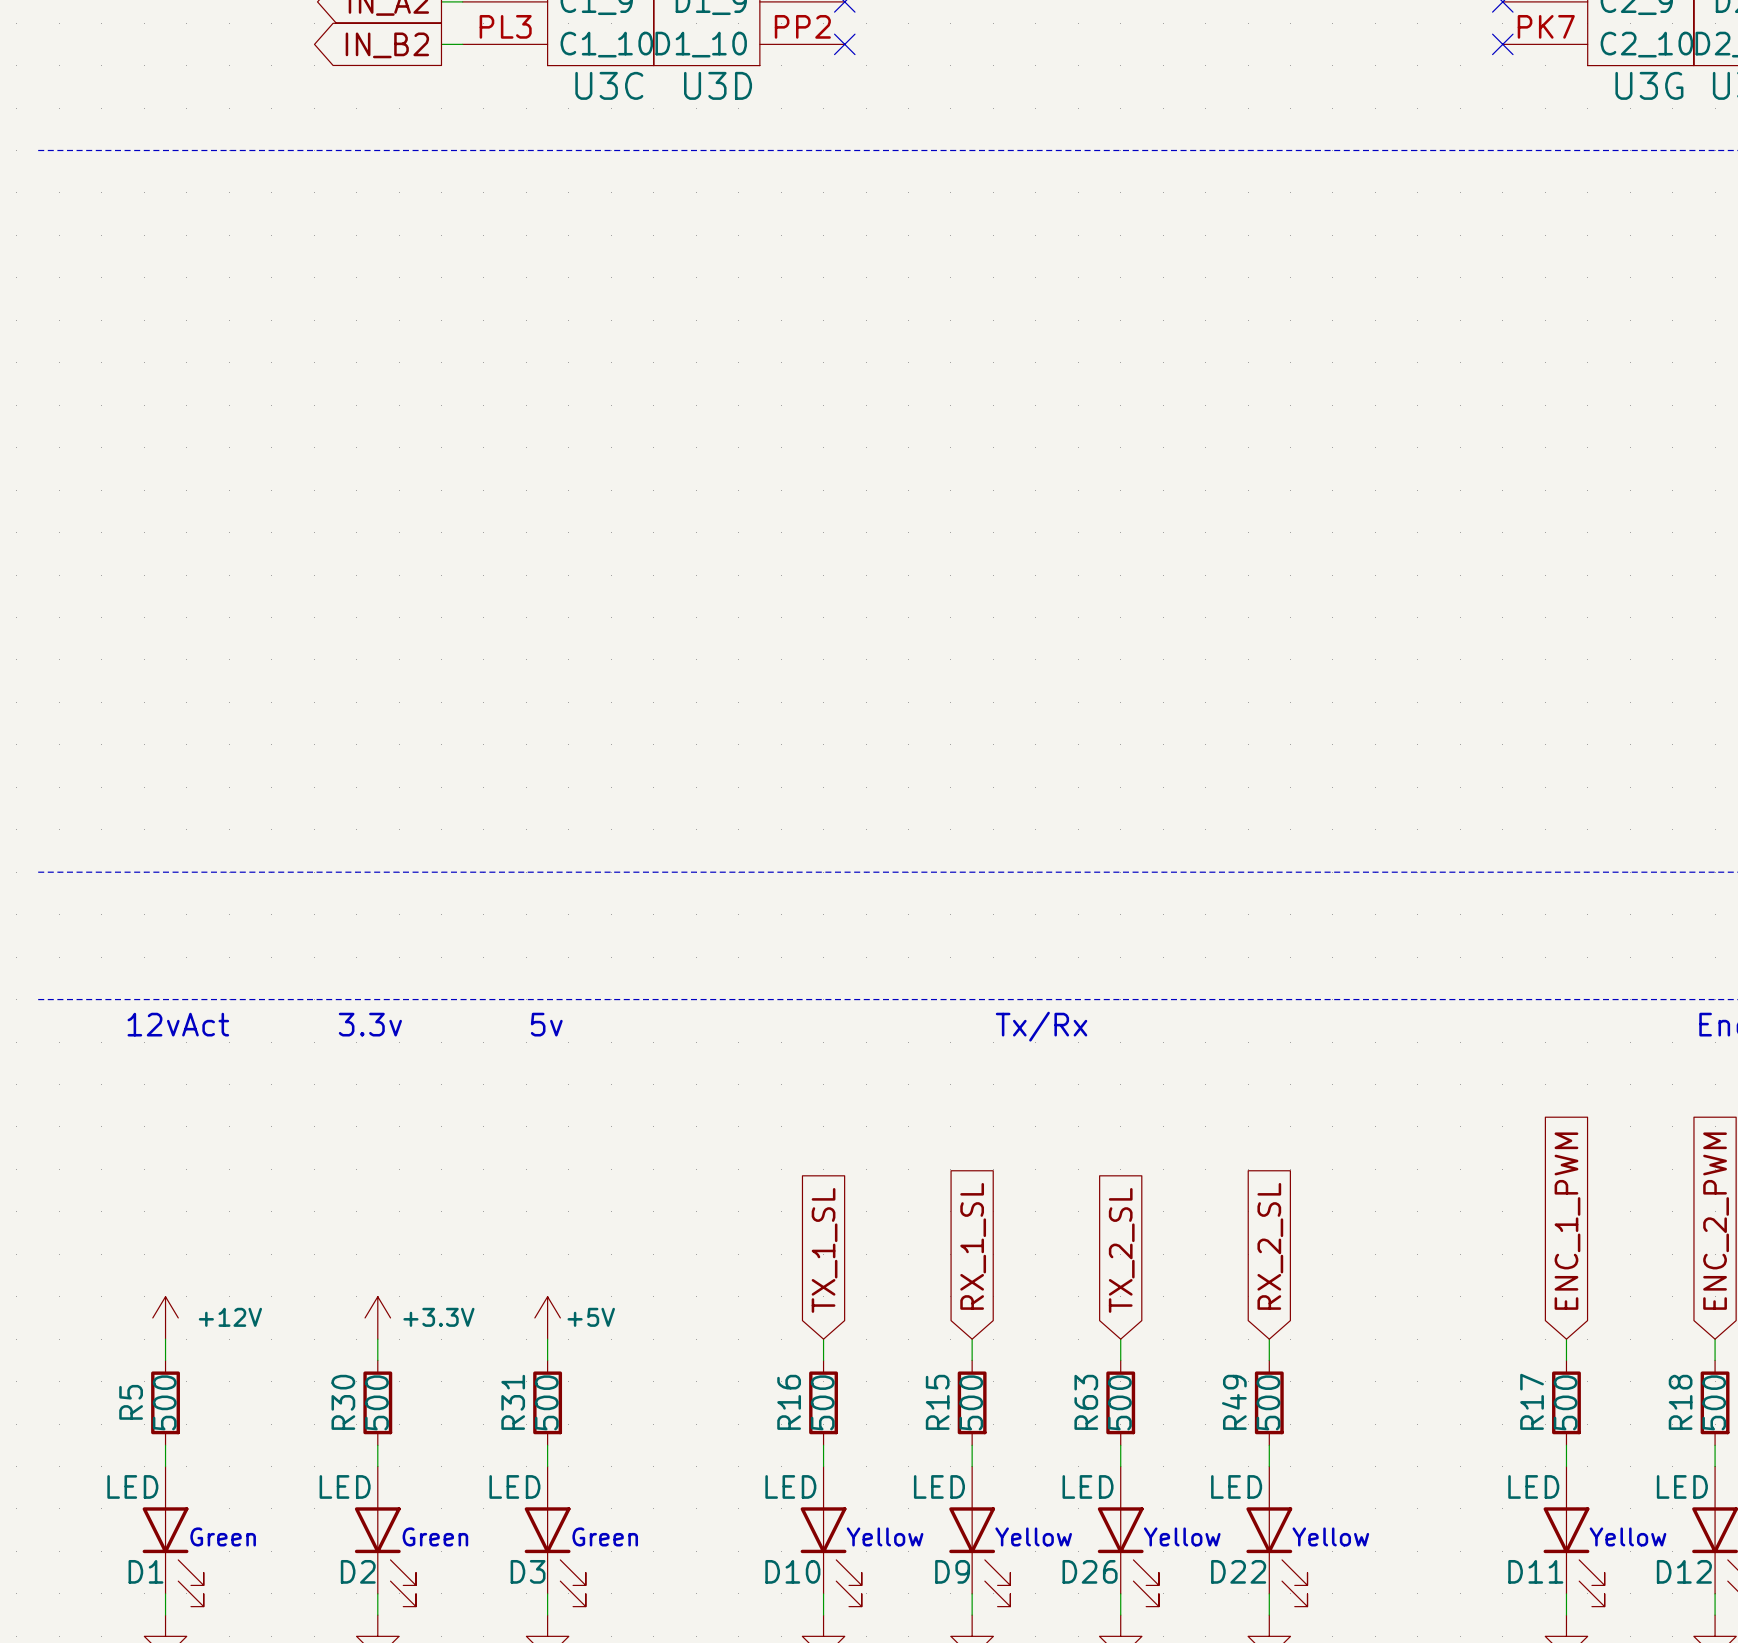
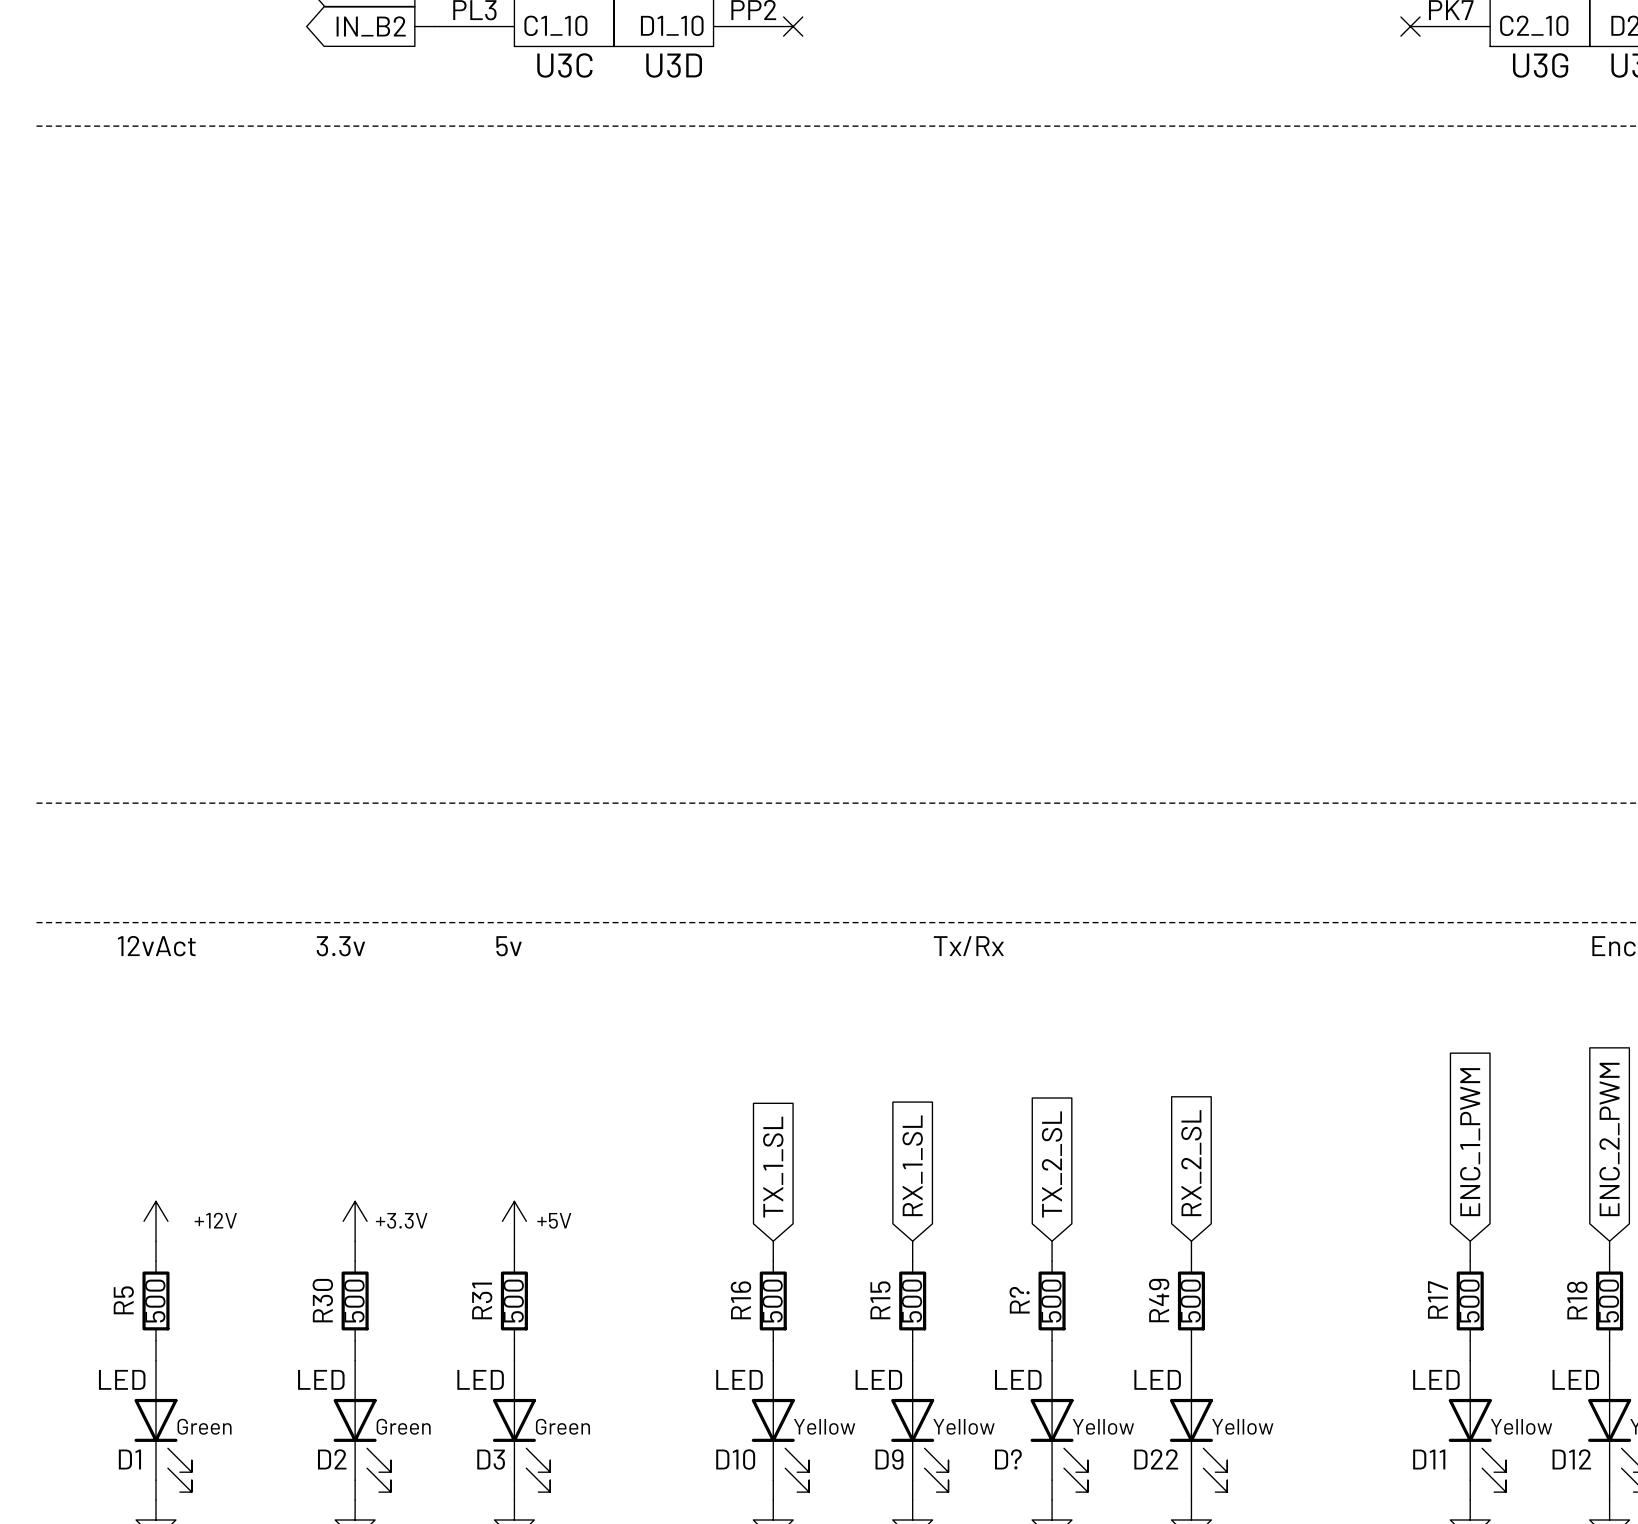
R63 name: R63 (1086, 1402) -> R? (1019, 1300)
D26 name: D26 (1090, 1571) -> D? (1008, 1459)

